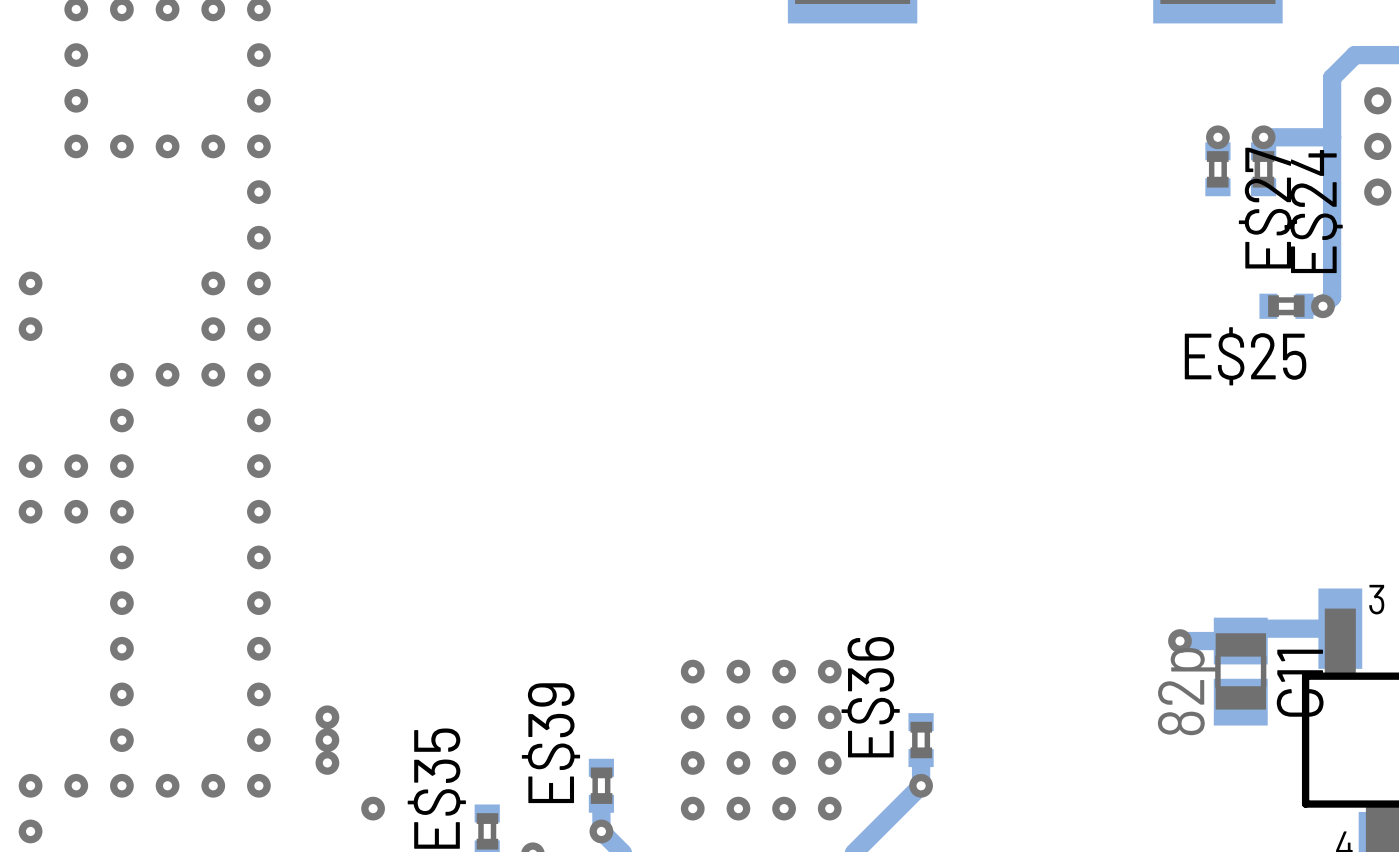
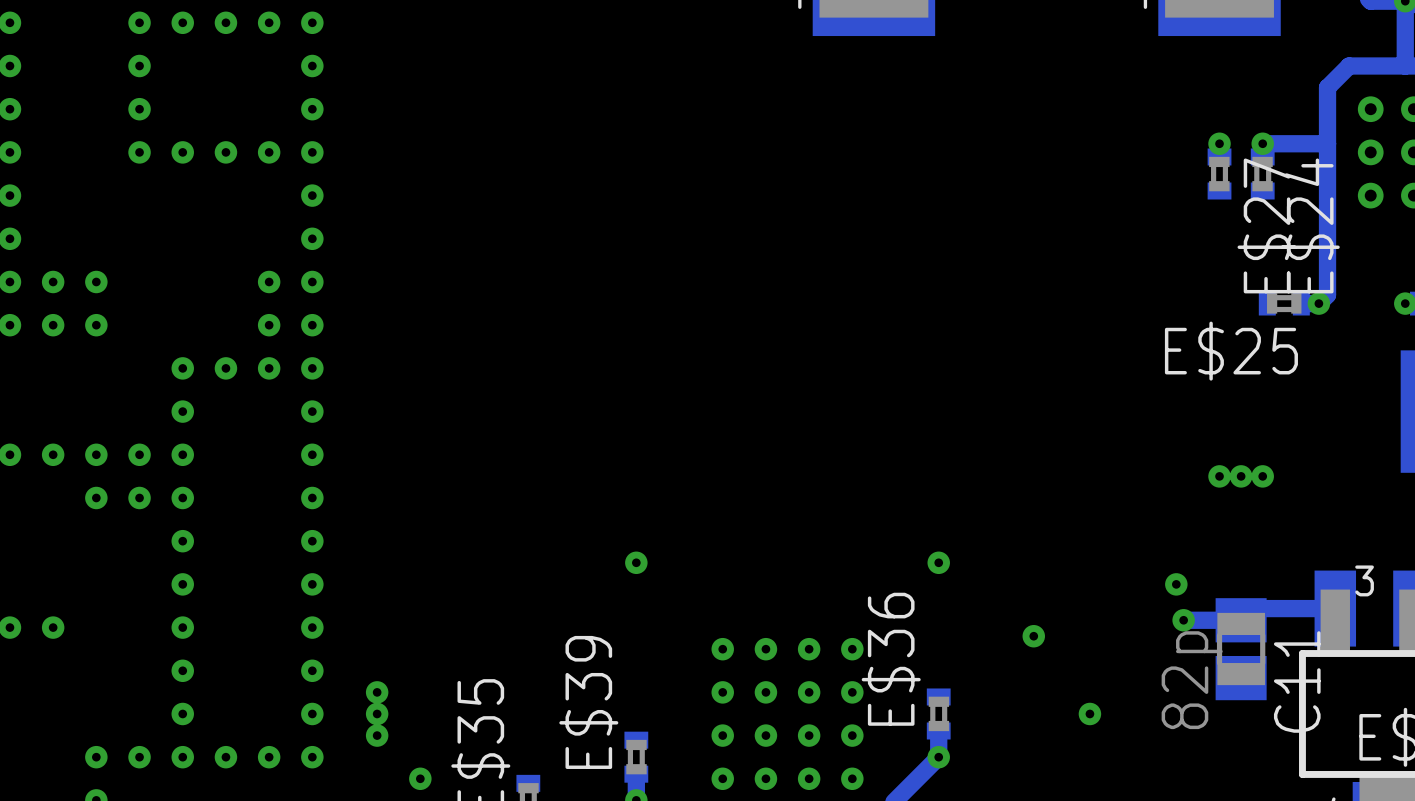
via: none -> (1219, 476)
via: none -> (1241, 476)
via: none -> (1262, 476)
via: none -> (636, 562)
via: none -> (938, 562)
via: none -> (1176, 584)
via: none -> (1033, 636)
via: none -> (1089, 713)

